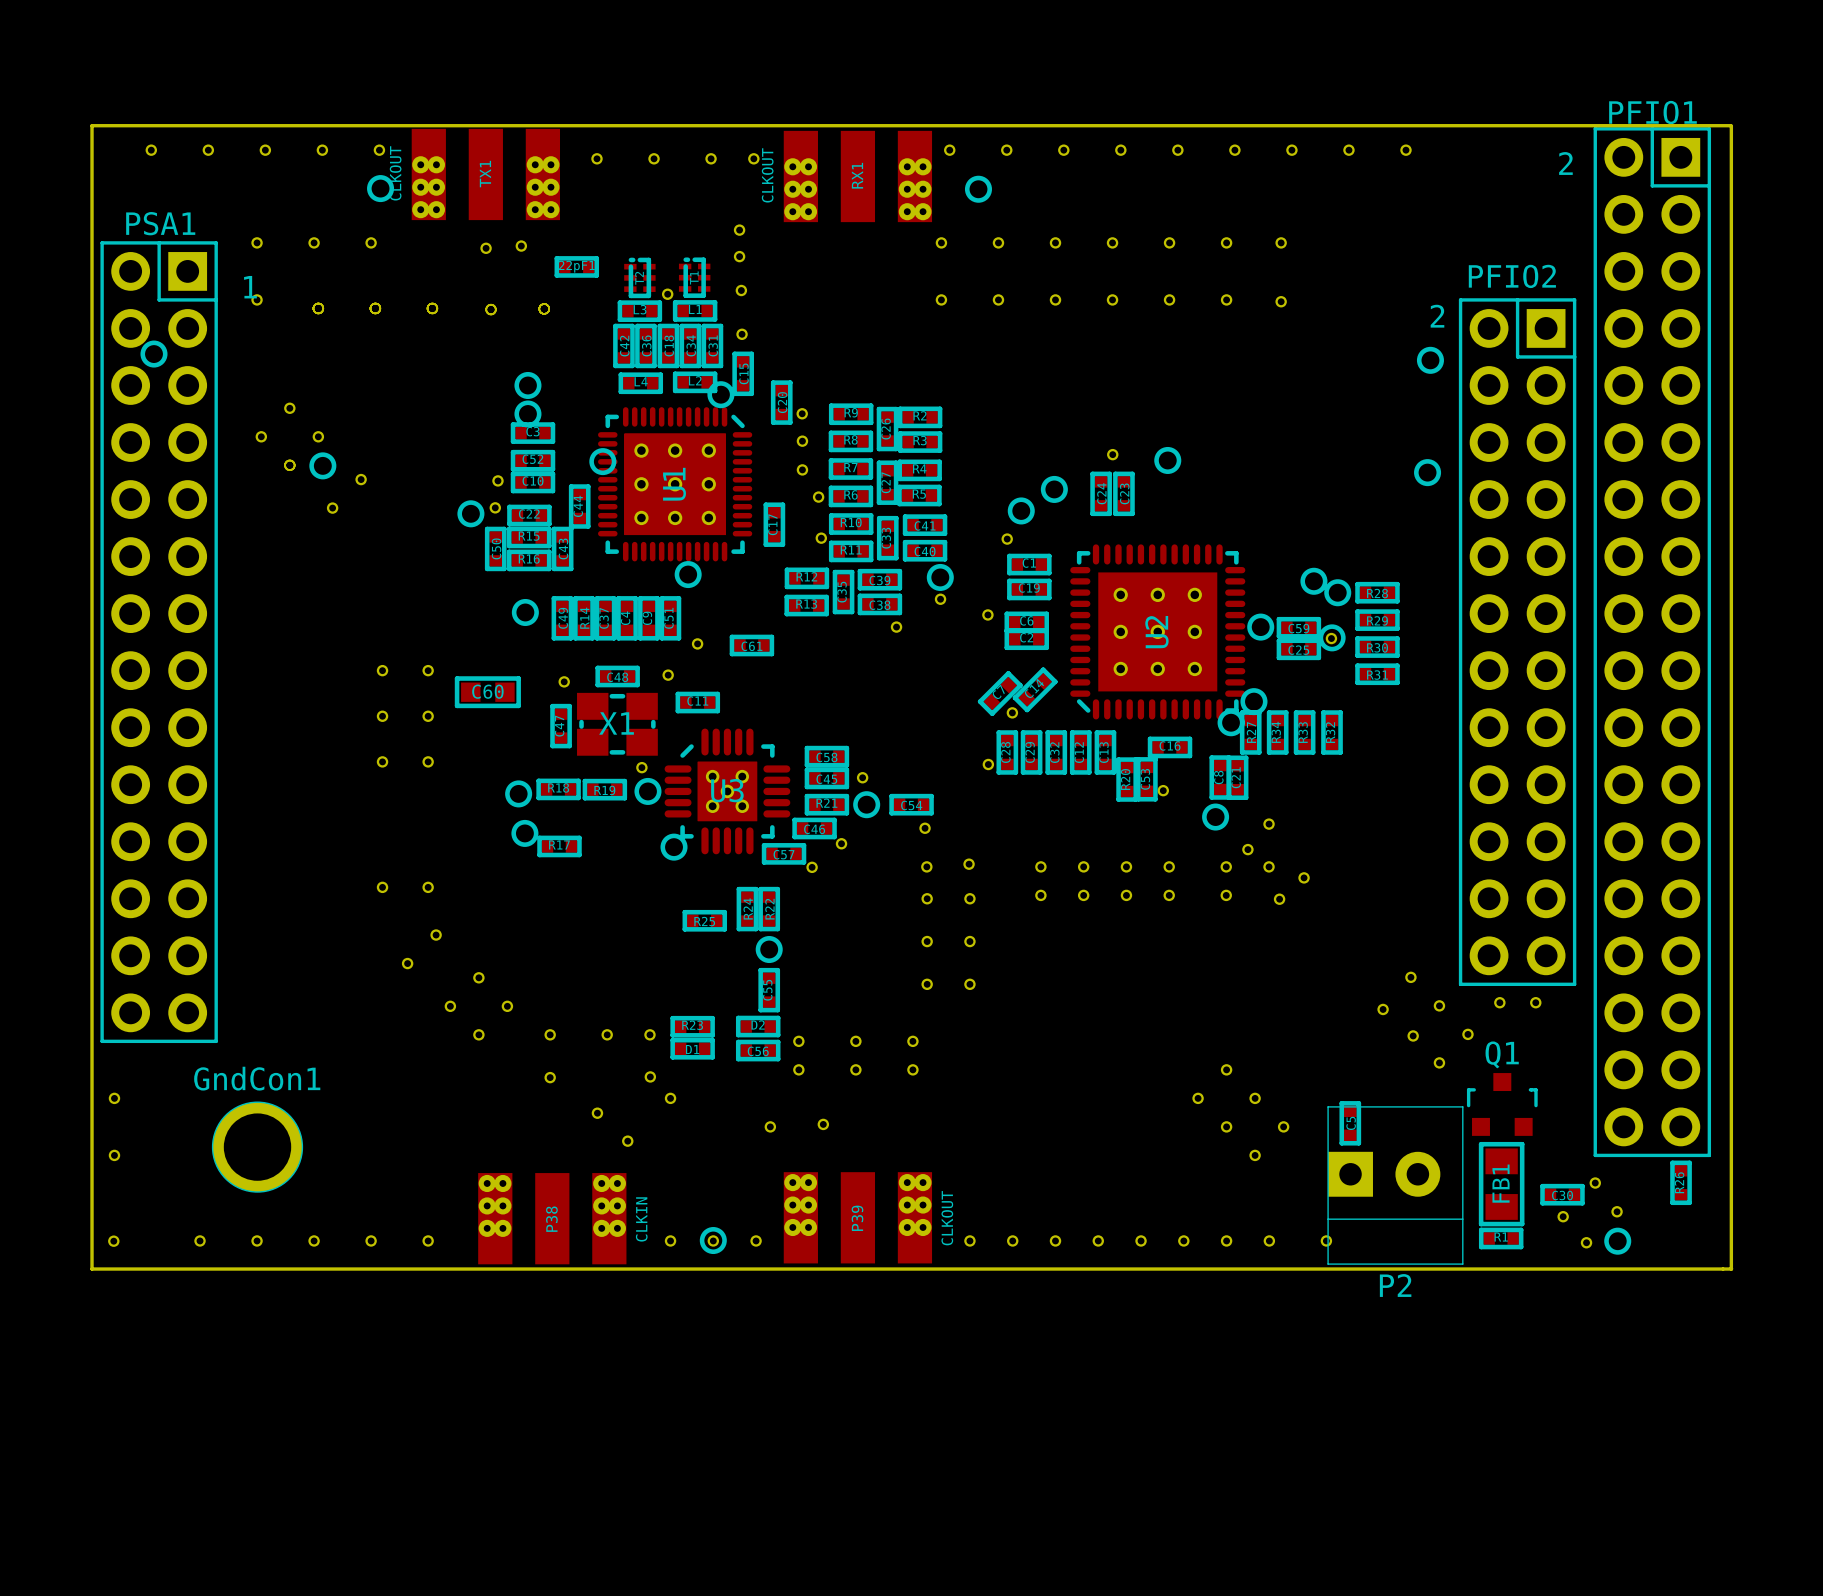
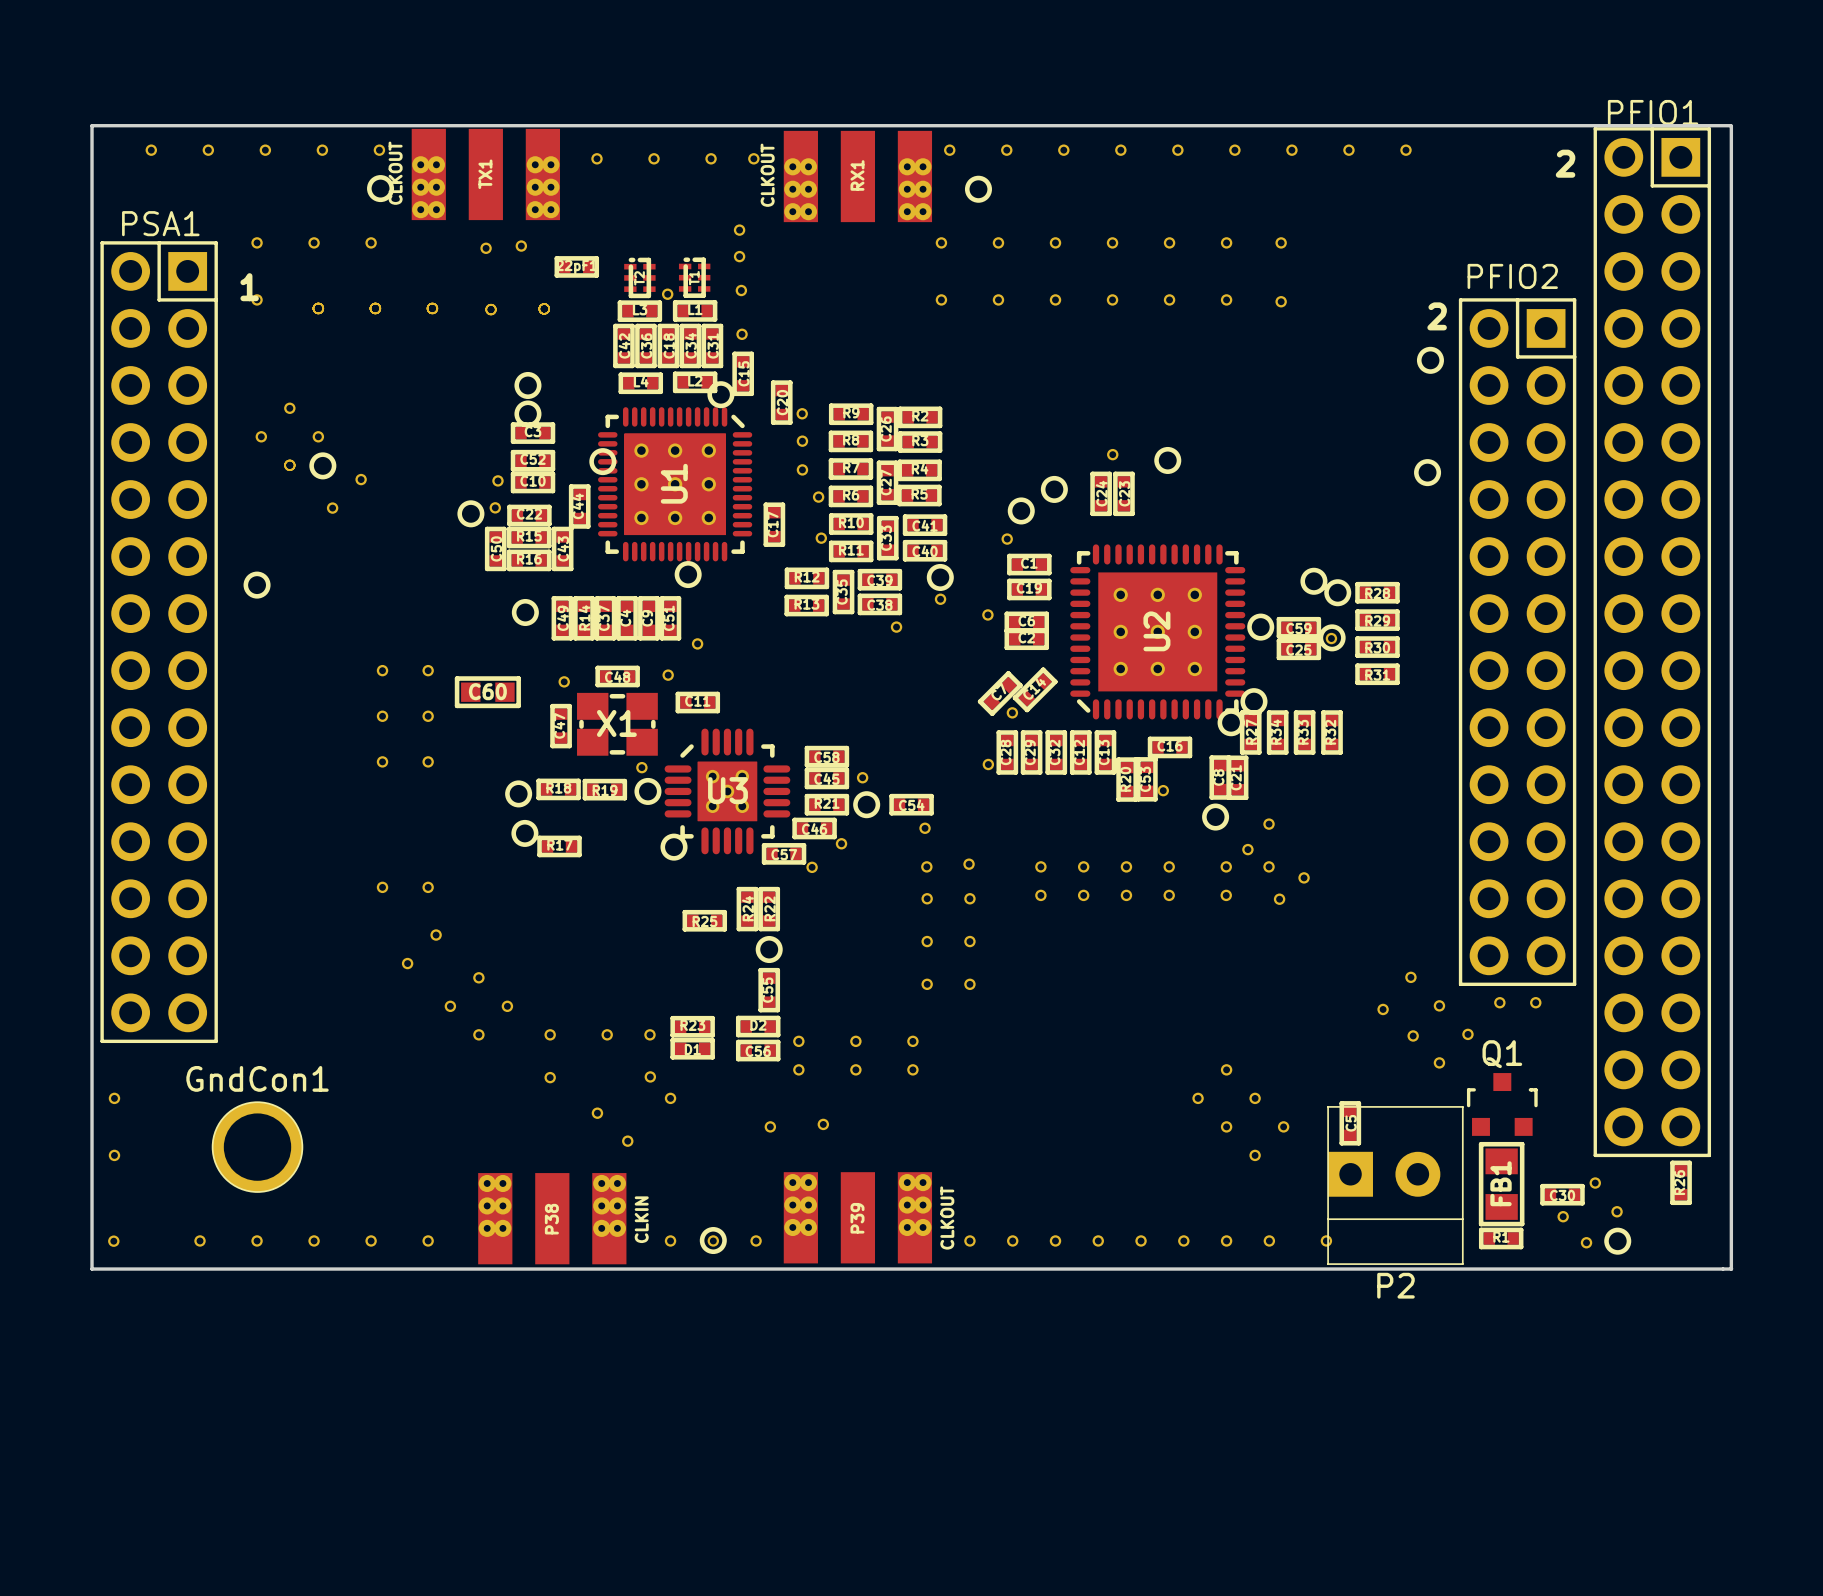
drawing position: (153, 354) -> (257, 585)
C61: (751, 645) -> none

